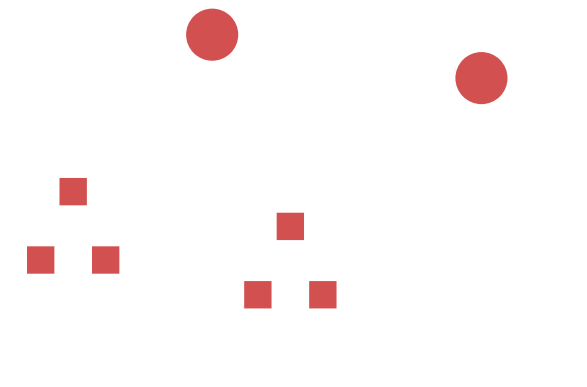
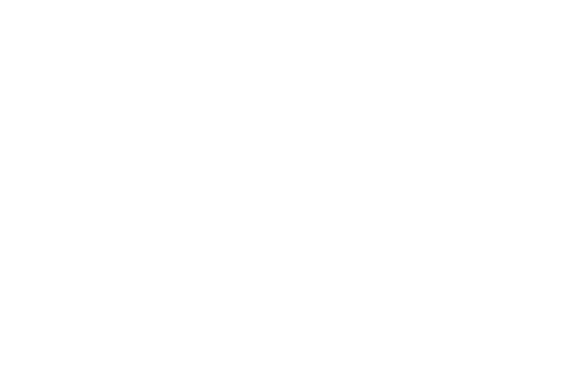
part: (212, 34) -> none
part: (481, 78) -> none
part: (73, 225) -> none
part: (290, 260) -> none

